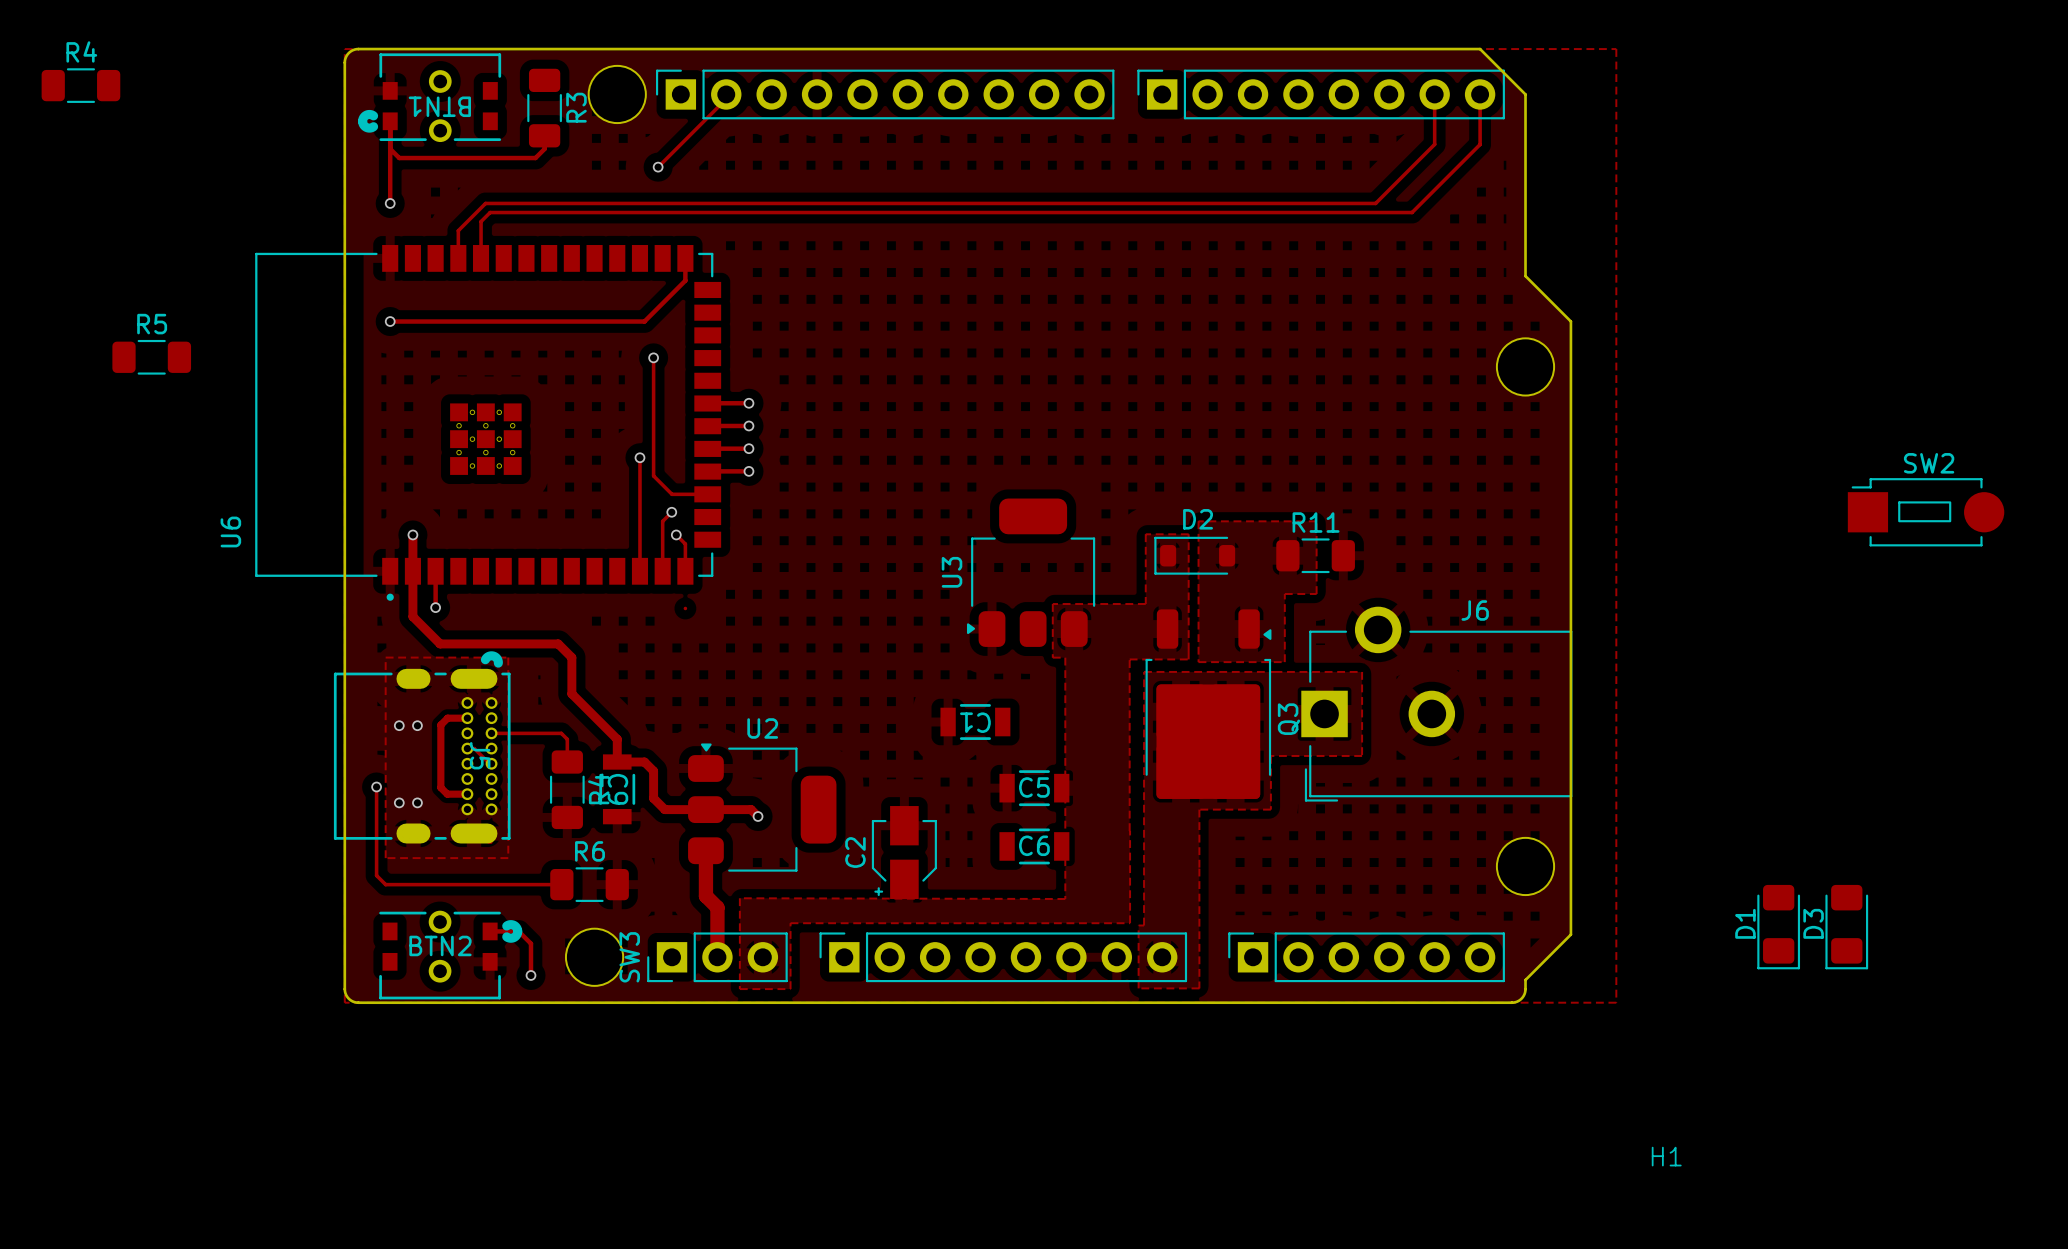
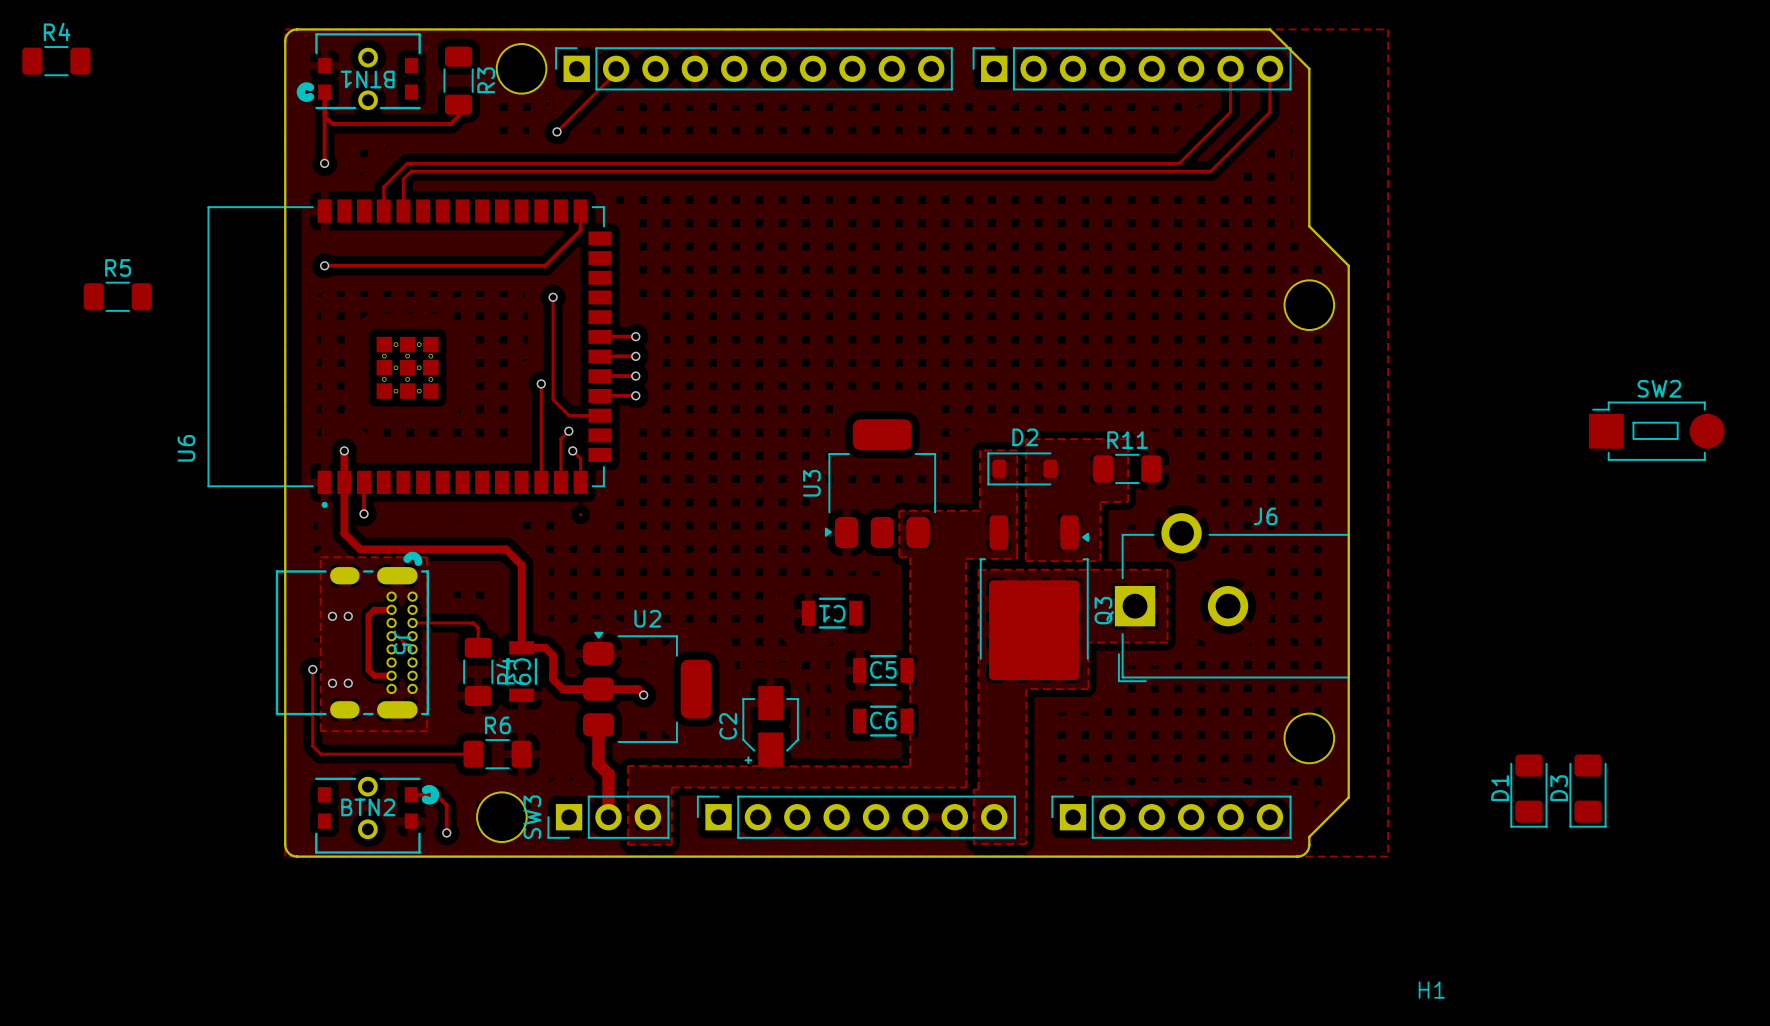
track: (412, 616) (440, 643) (558, 643) (571, 657) (571, 693) (617, 739) -> (344, 521) (344, 533) (360, 549) (505, 549) (521, 565) (521, 628)

